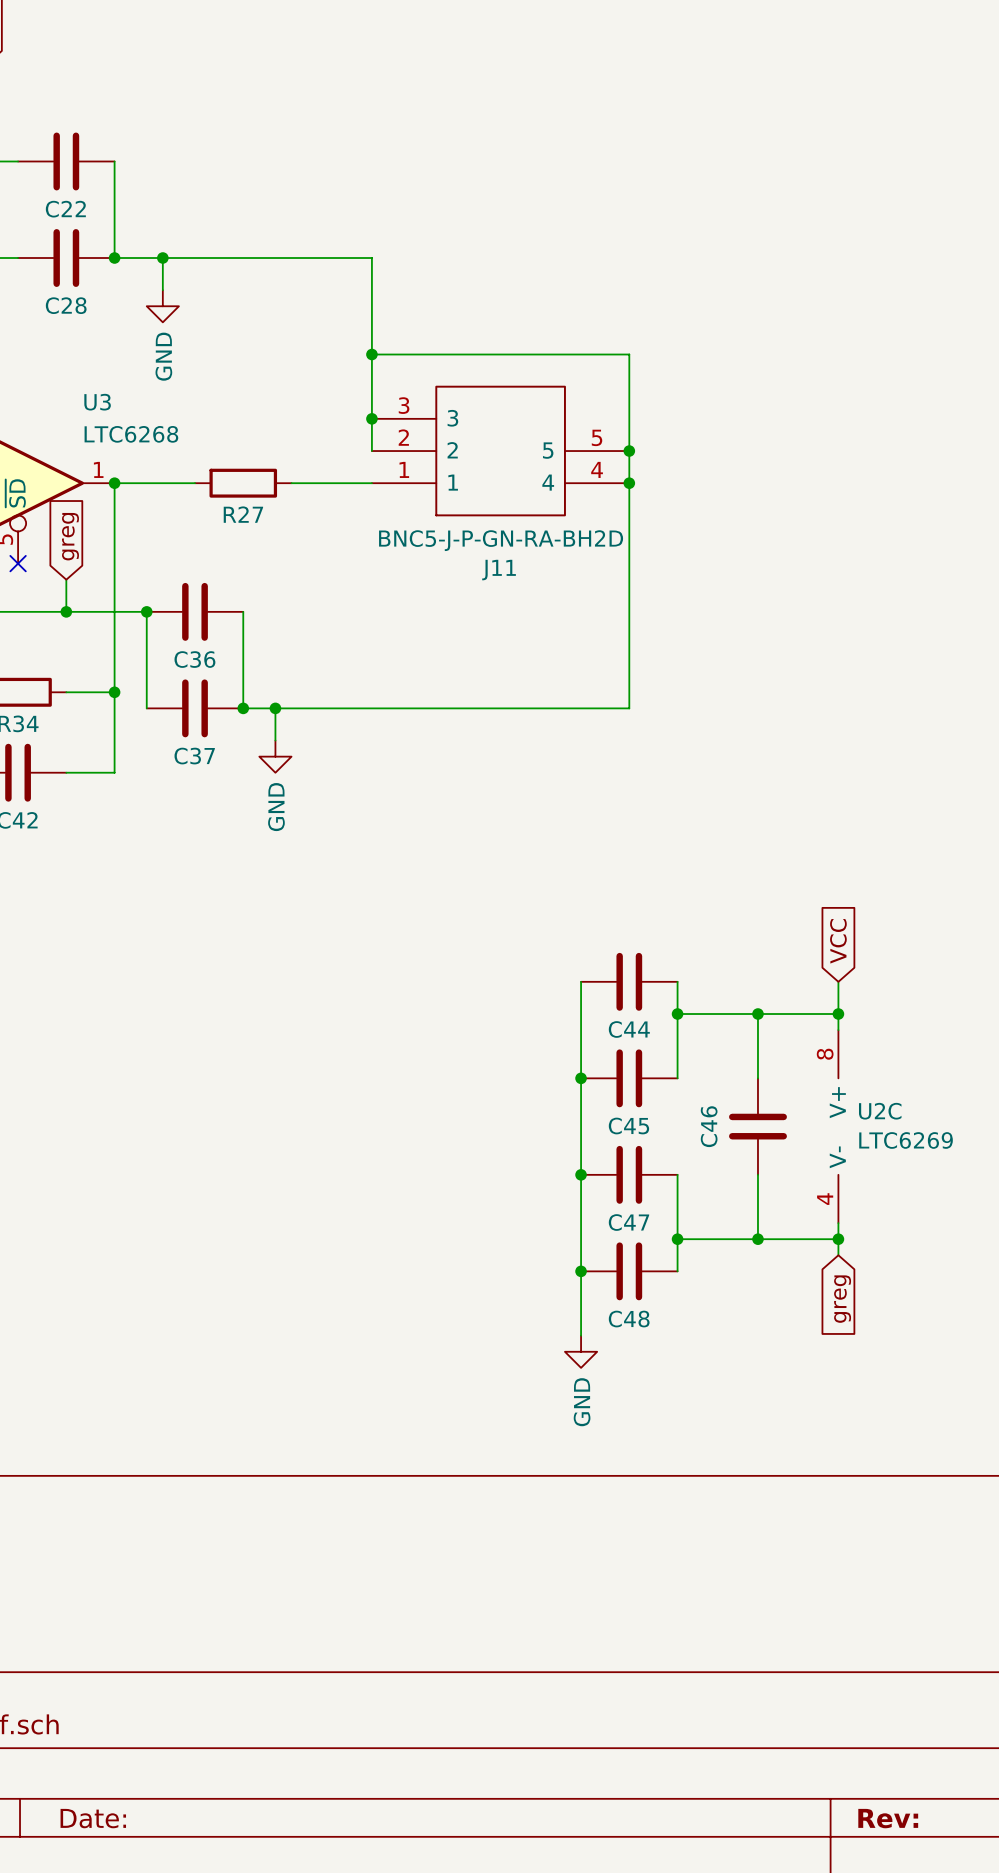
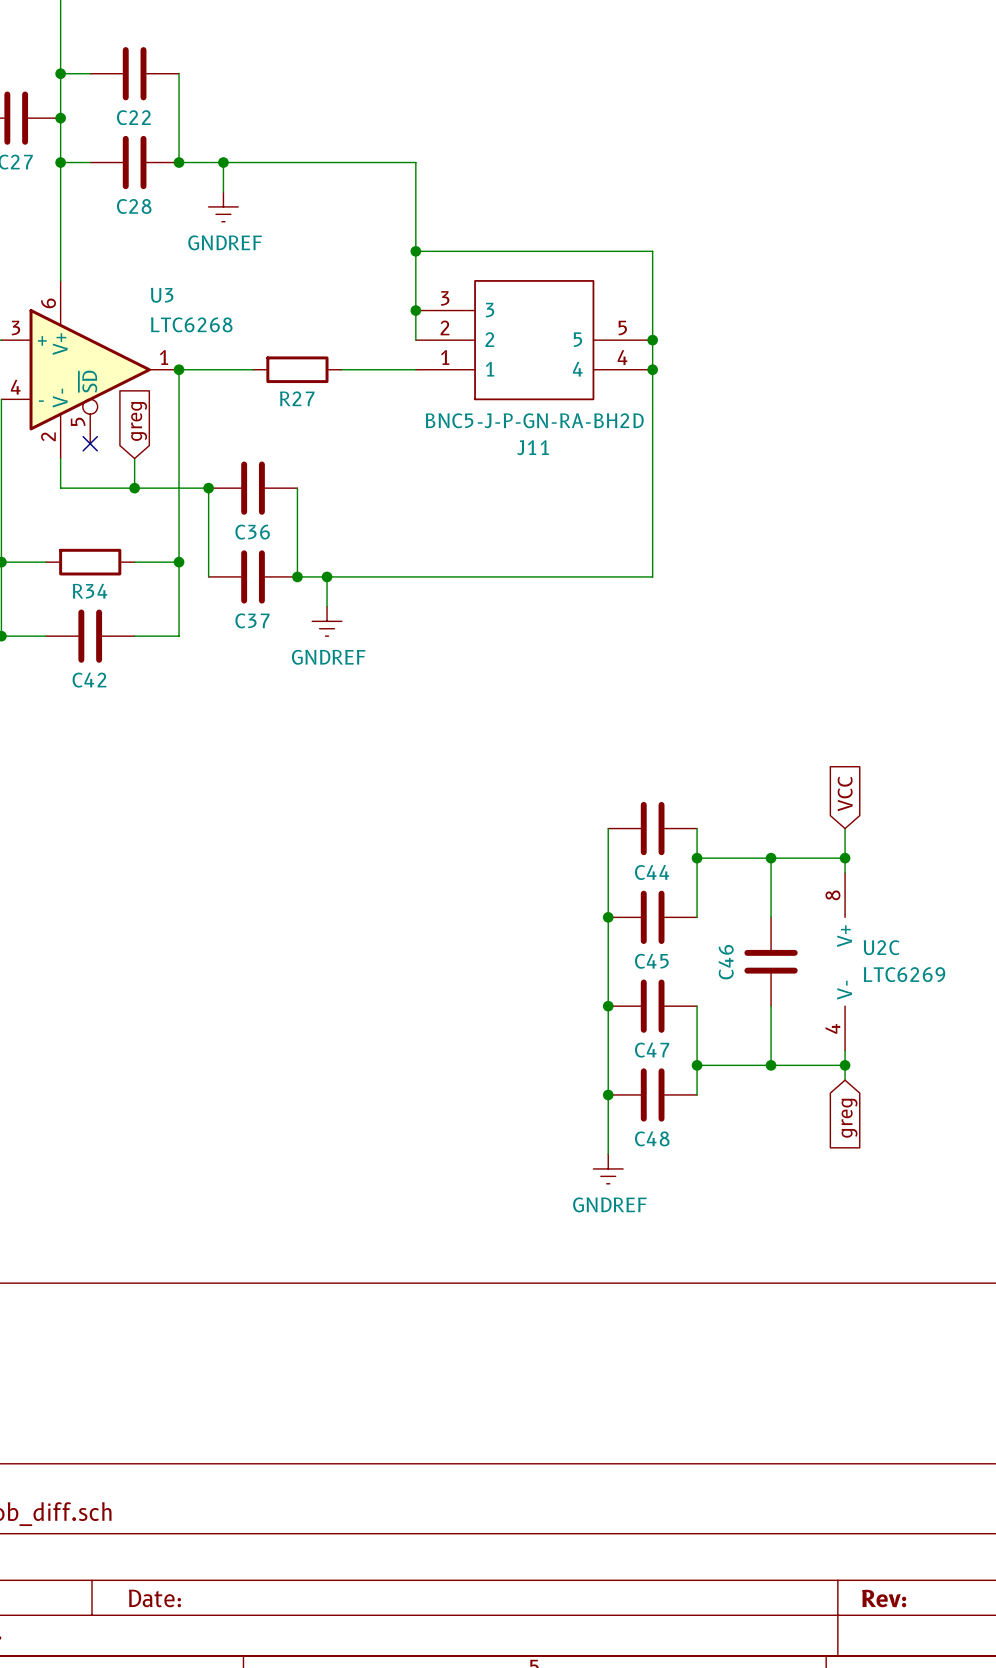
power symbol: GND (162, 306) -> GNDREF (223, 206)
power symbol: GND (275, 756) -> GNDREF (327, 621)
power symbol: GND (581, 1351) -> GNDREF (608, 1168)

